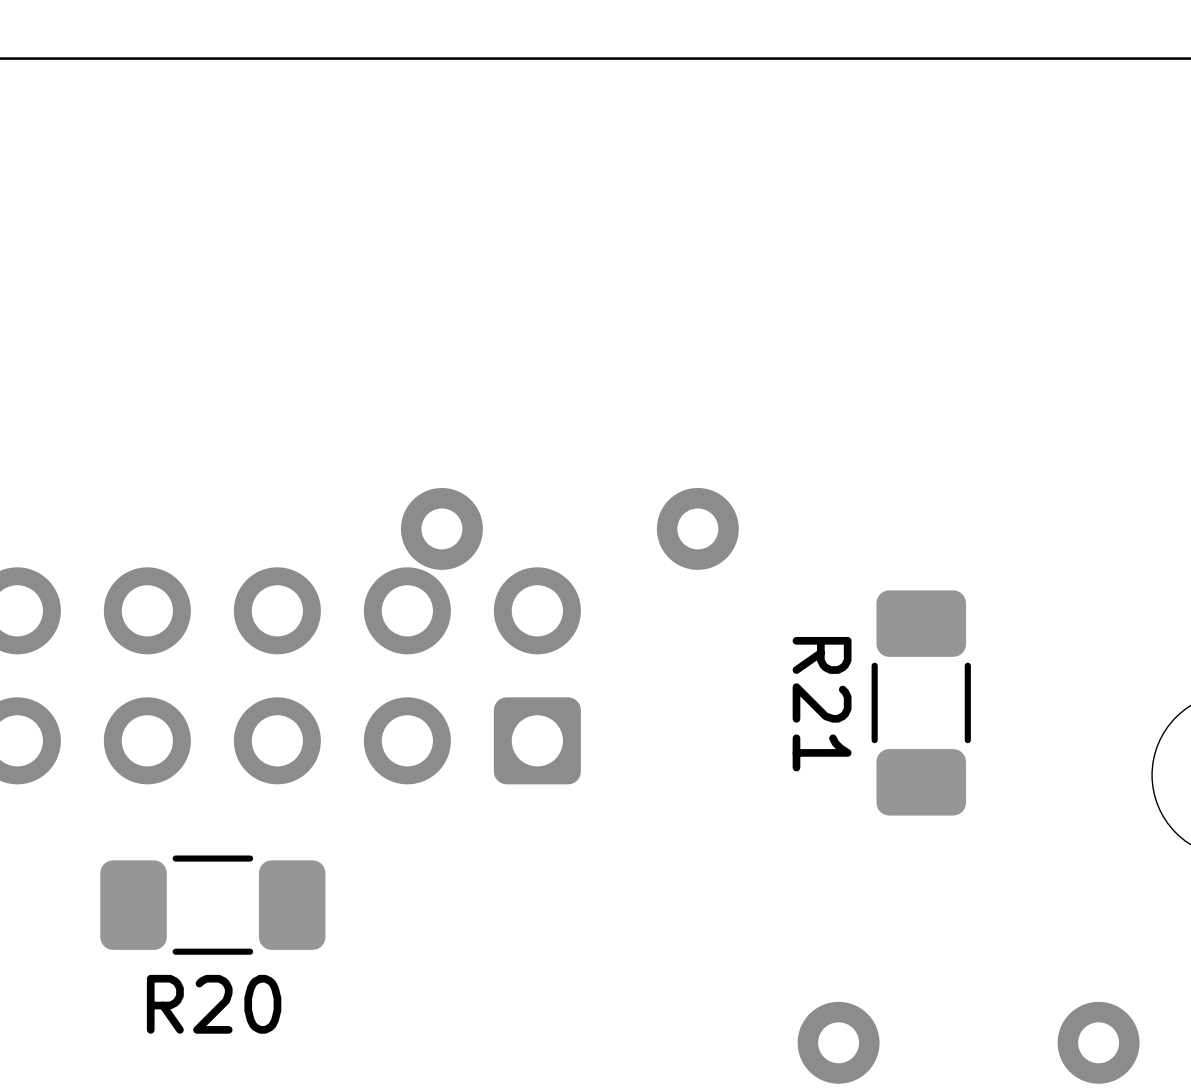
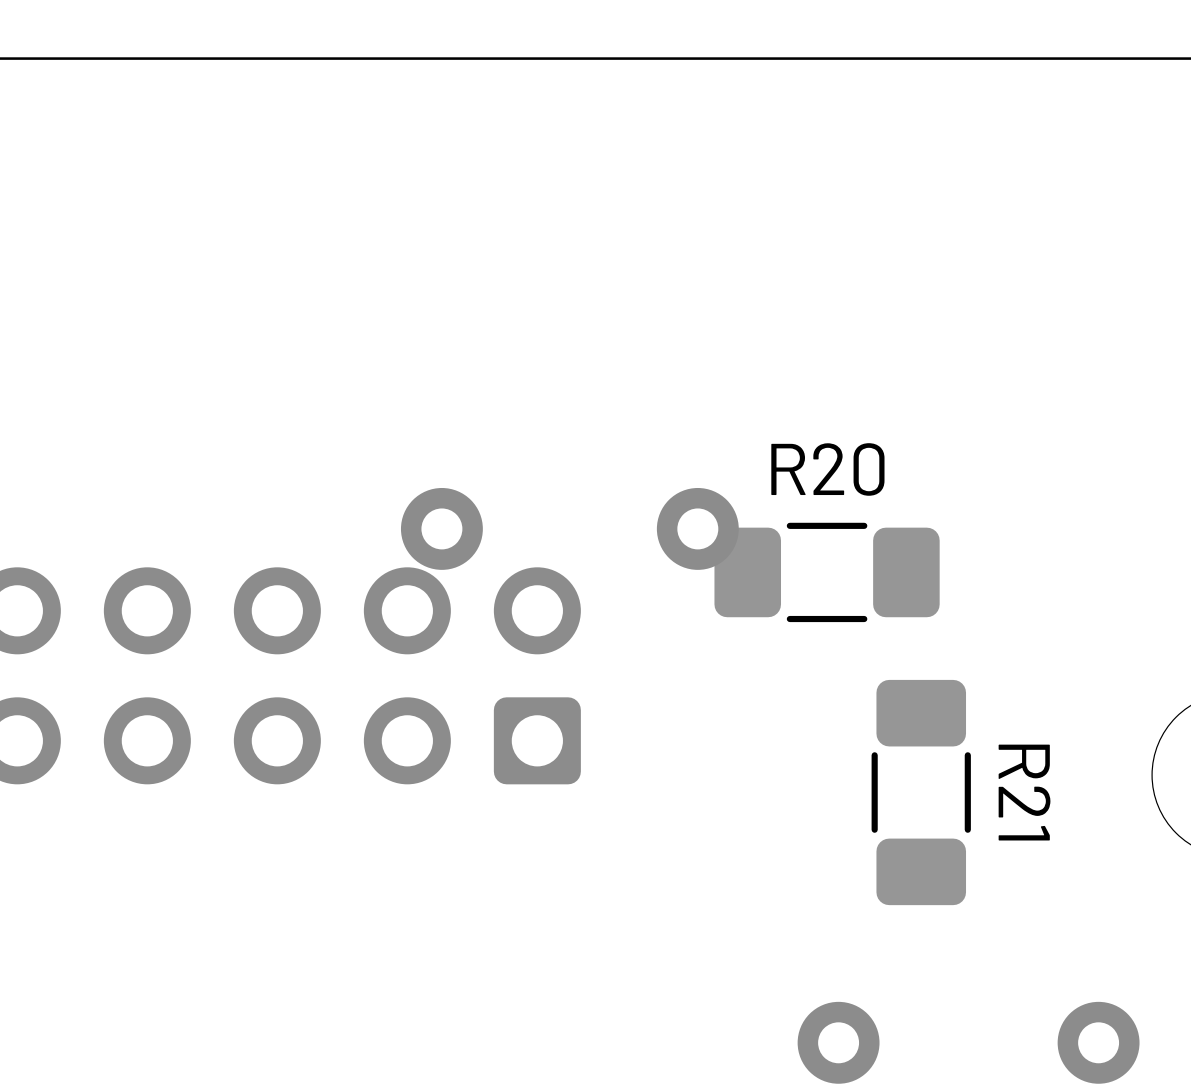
R21 position: (921, 702) -> (921, 792)
R21 name position: R21 (822, 704) -> R21 (1024, 792)
R20 position: (212, 905) -> (827, 572)
R20 name position: R20 (214, 1004) -> R20 (827, 469)

